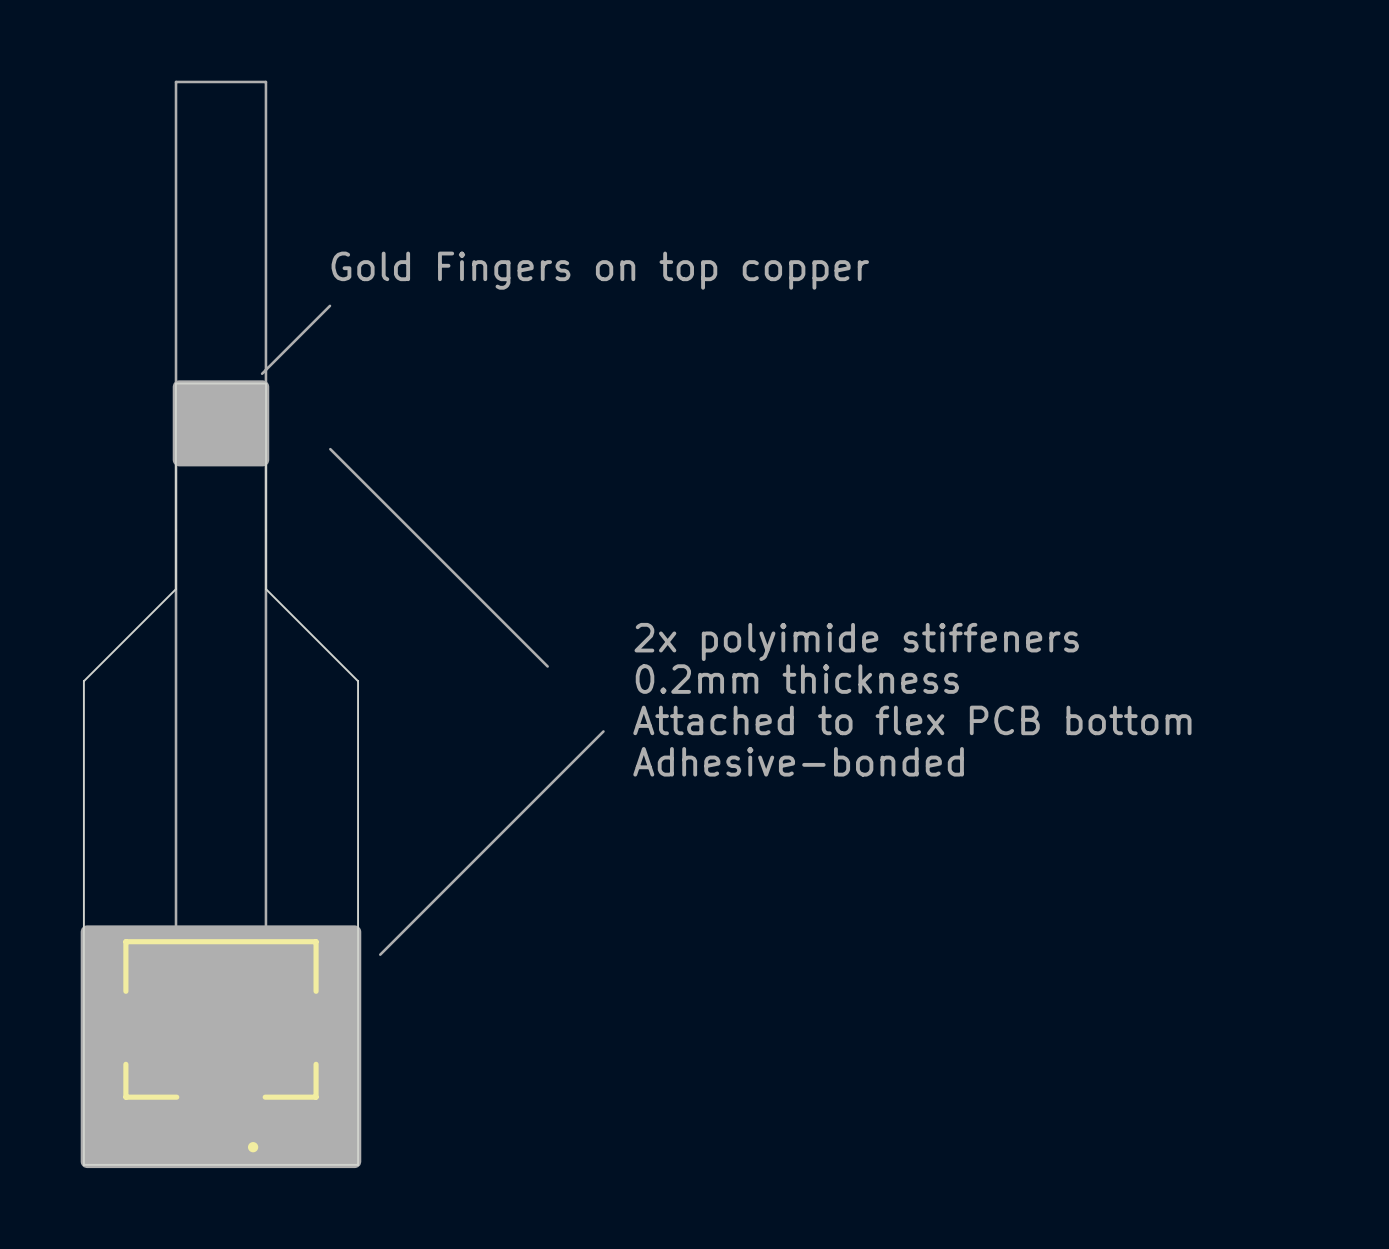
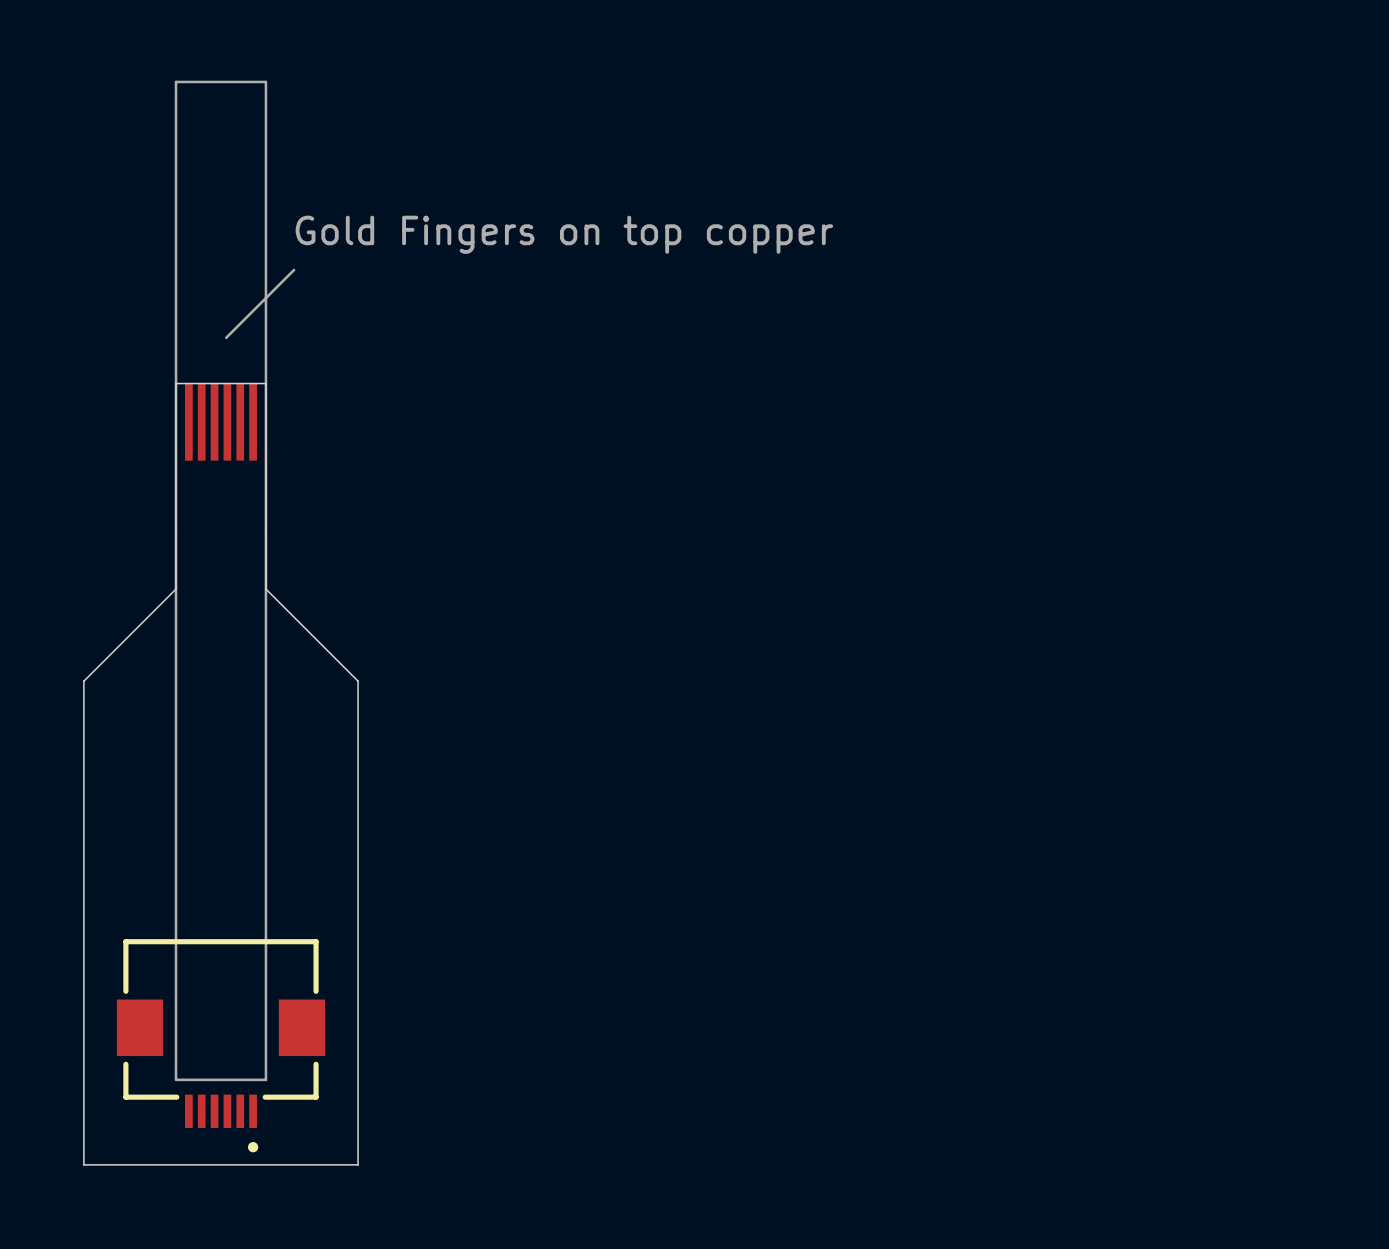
text position: Gold Fingers on top copper (600, 270) -> Gold Fingers on top copper (564, 234)
line: (329, 305) (262, 373) -> (294, 269) (226, 337)
drawing: [172, 380, 270, 467] -> none
line: (330, 449) (547, 666) -> none
text: 2x polyimide stiffeners (856, 641) -> none
text: 0.2mm thickness (797, 679) -> none
text: Attached to flex PCB bottom (912, 720) -> none
line: (603, 731) (380, 954) -> none
text: Adhesive-bonded (798, 761) -> none
drawing: [80, 925, 362, 1169] -> none

